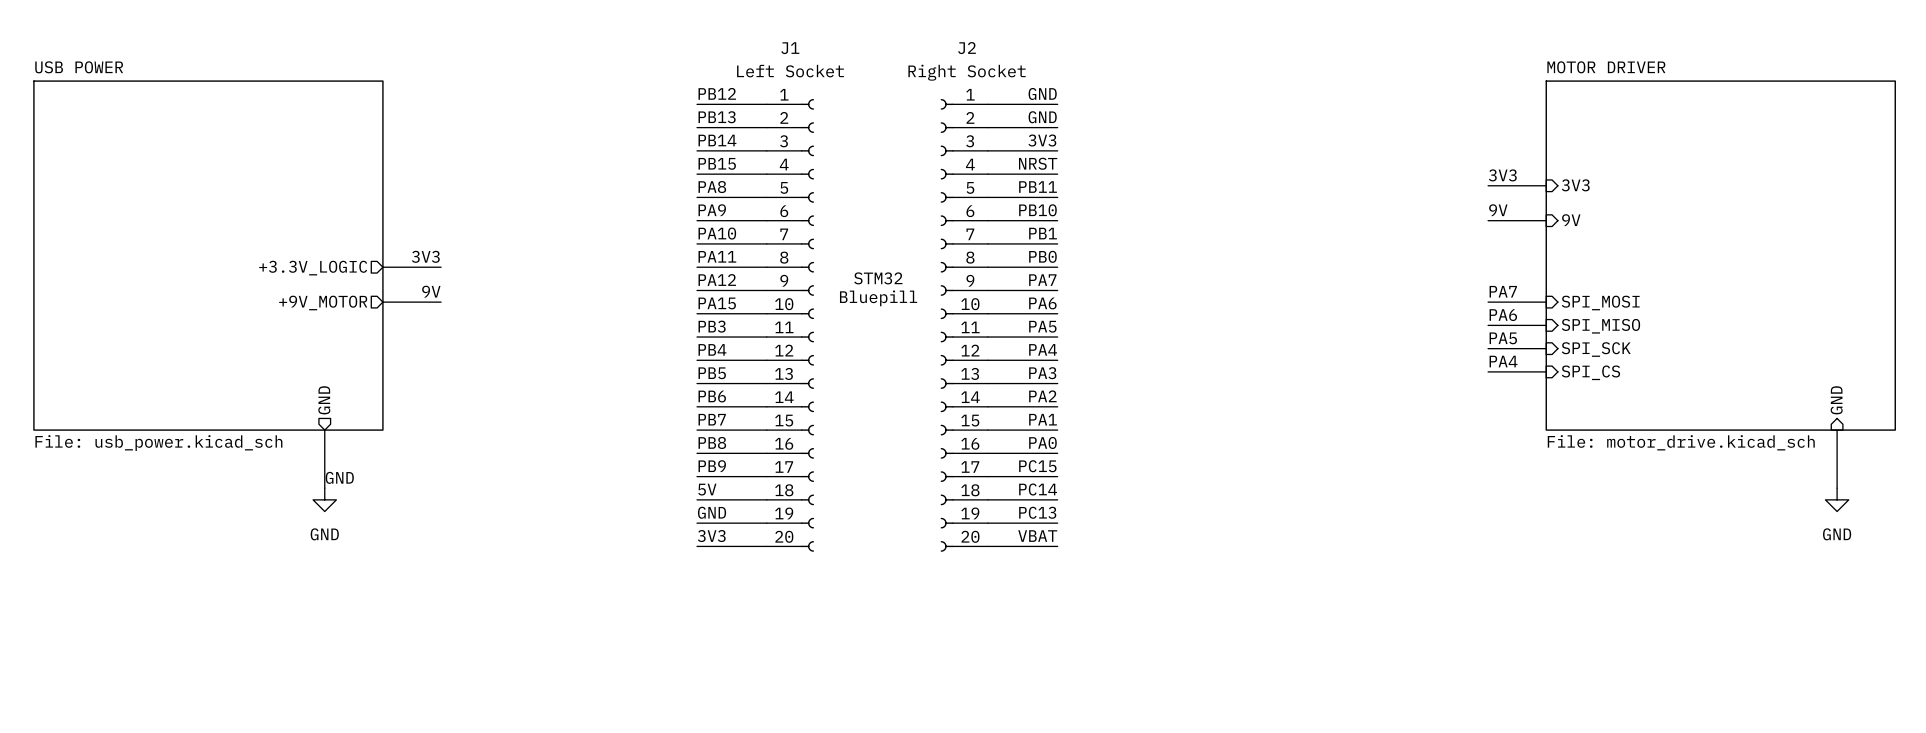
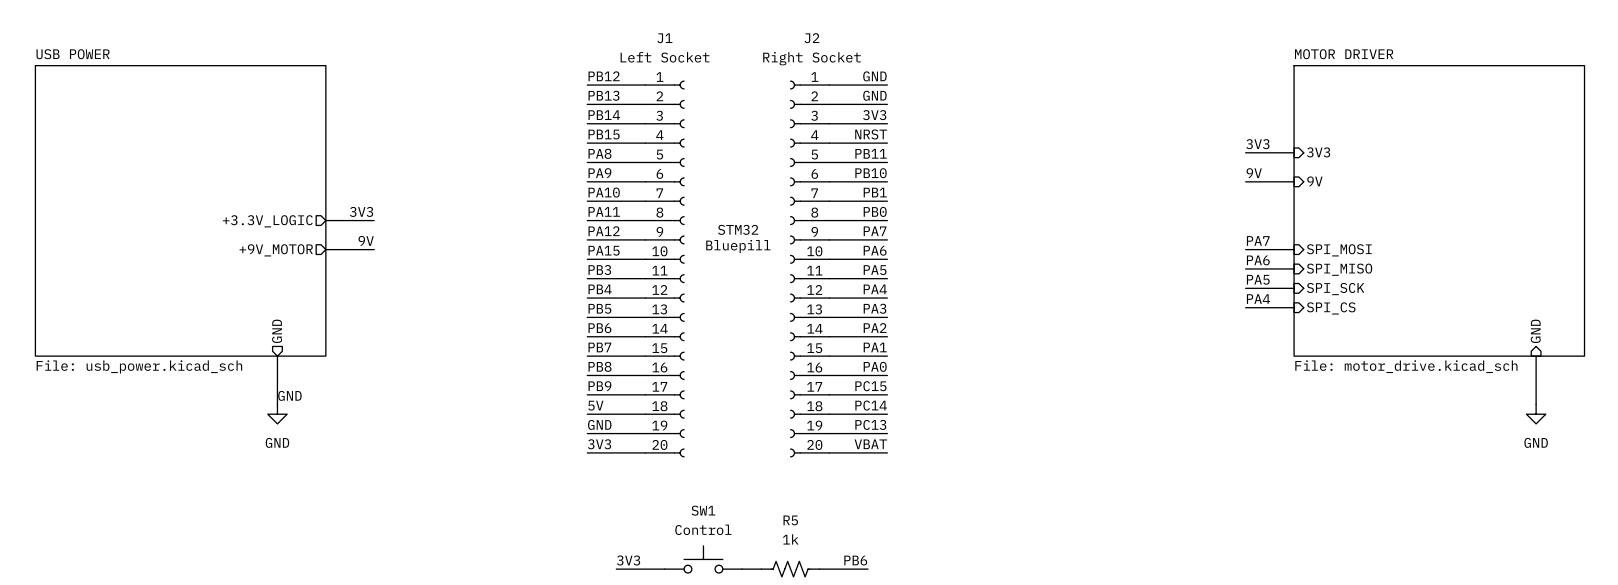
SW1: none -> Control (703, 559)
label: none -> 3V3 (628, 560)
label: none -> PB6 (855, 560)
wire: none -> (616, 569) (664, 569)
wire: none -> (742, 569) (761, 569)
R5: none -> 1k (790, 569)
wire: none -> (819, 569) (868, 569)

